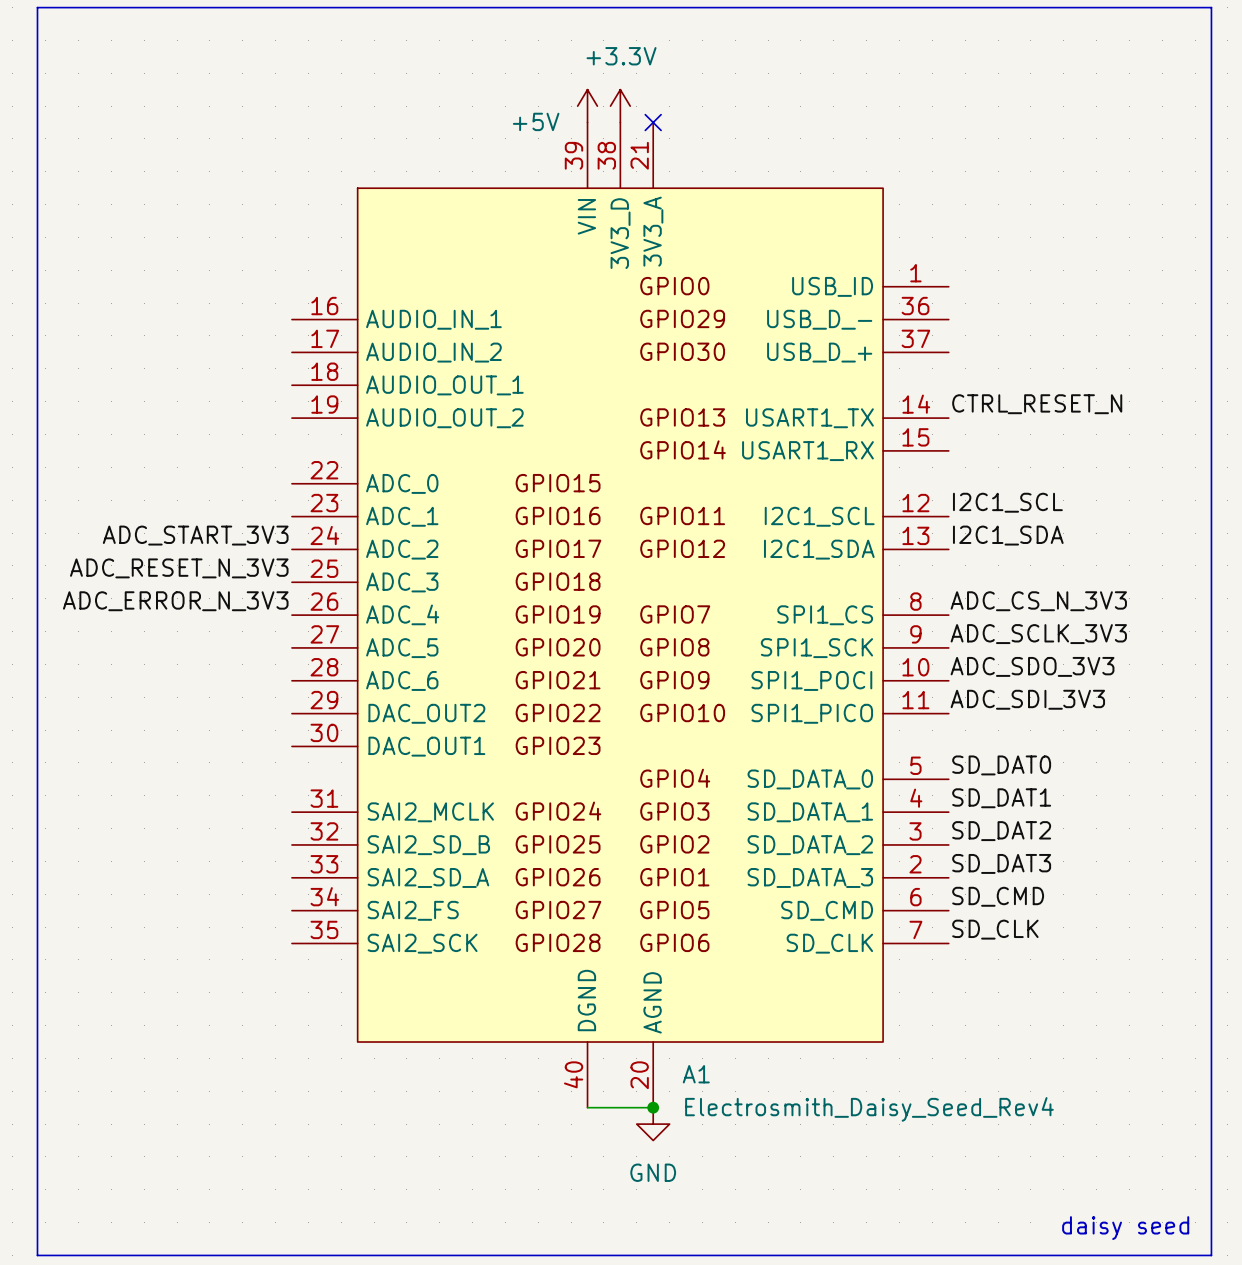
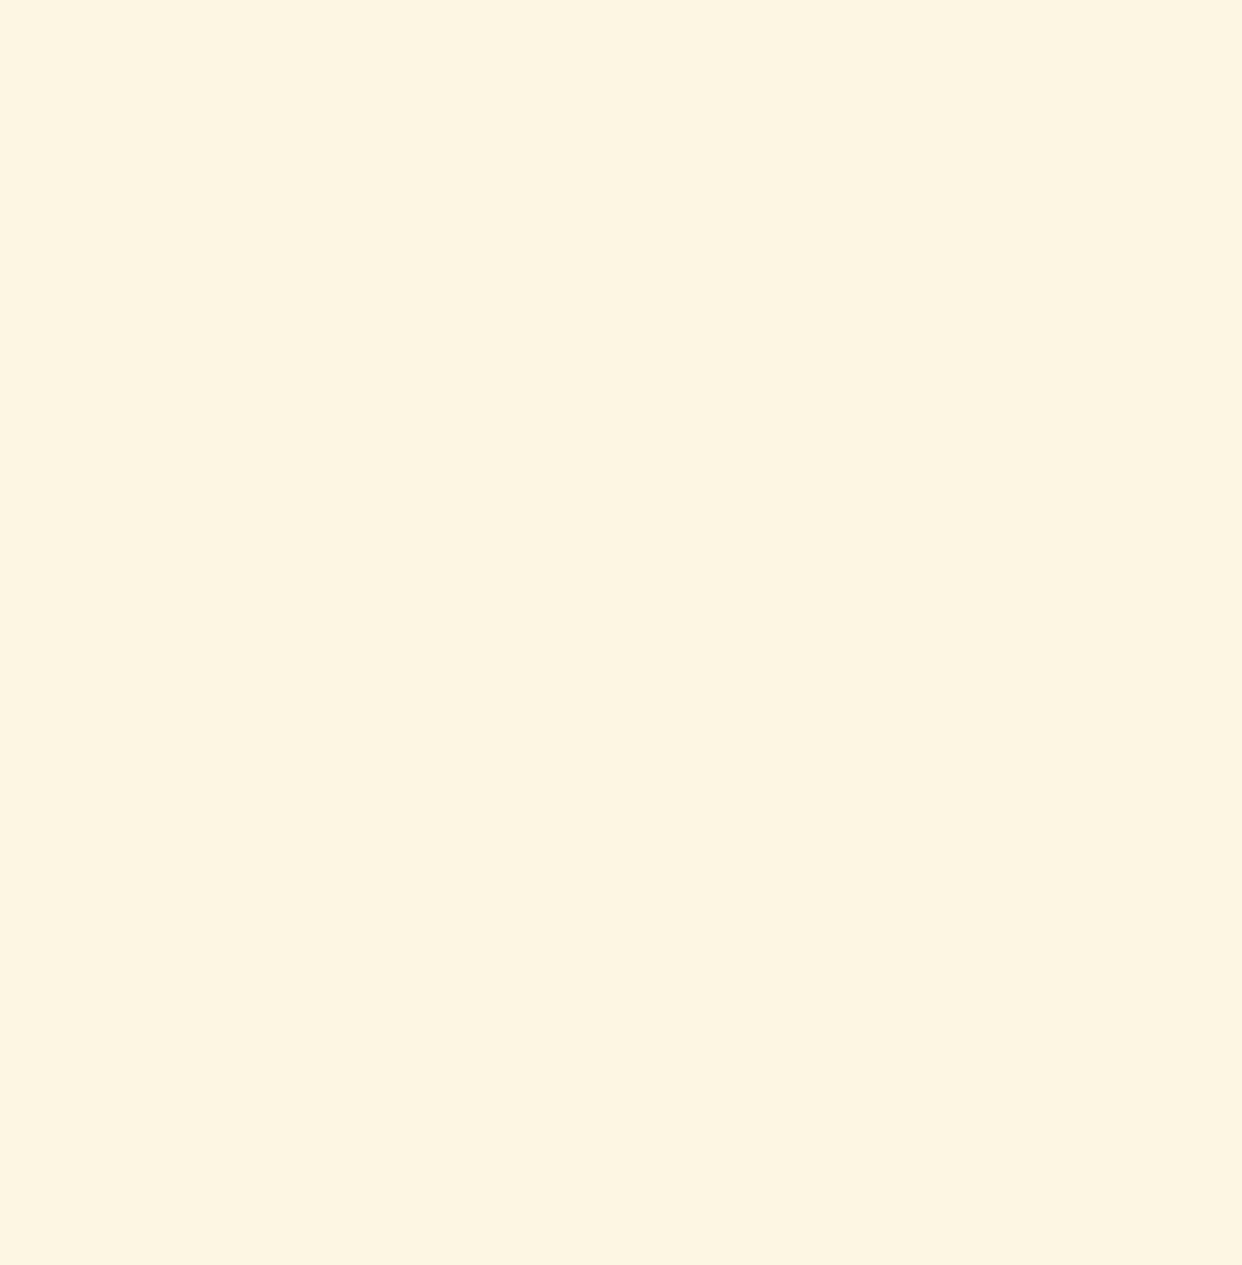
line: (37, 7) (1211, 7) (1211, 1255) (37, 1255) (37, 7) -> none
power symbol: +5V (587, 106) -> none
power symbol: +3.3V (620, 106) -> none
no-connect mark: (653, 122) -> none
label: CTRL_RESET_N (1037, 404) -> none
label: I2C1_SCL (1007, 502) -> none
label: ADC_START_3V3 (195, 535) -> none
label: I2C1_SDA (1008, 535) -> none
label: ADC_RESET_N_3V3 (179, 568) -> none
label: ADC_ERROR_N_3V3 (175, 601) -> none
label: ADC_CS_N_3V3 (1038, 601) -> none
A1: Electrosmith_Daisy_Seed_Rev4 (620, 615) -> none
label: ADC_SCLK_3V3 (1038, 634) -> none
label: ADC_SDO_3V3 (1032, 666) -> none
label: ADC_SDI_3V3 (1027, 699) -> none
label: SD_DAT0 (1001, 765) -> none
label: SD_DAT1 (1001, 798) -> none
label: SD_DAT2 (1001, 831) -> none
label: SD_DAT3 (1001, 863) -> none
label: SD_CMD (998, 896) -> none
label: SD_CLK (995, 929) -> none
wire: (587, 1107) (653, 1107) -> none
junction: (653, 1107) -> none
power symbol: GND (653, 1124) -> none
text: daisy seed (1125, 1228) -> none

